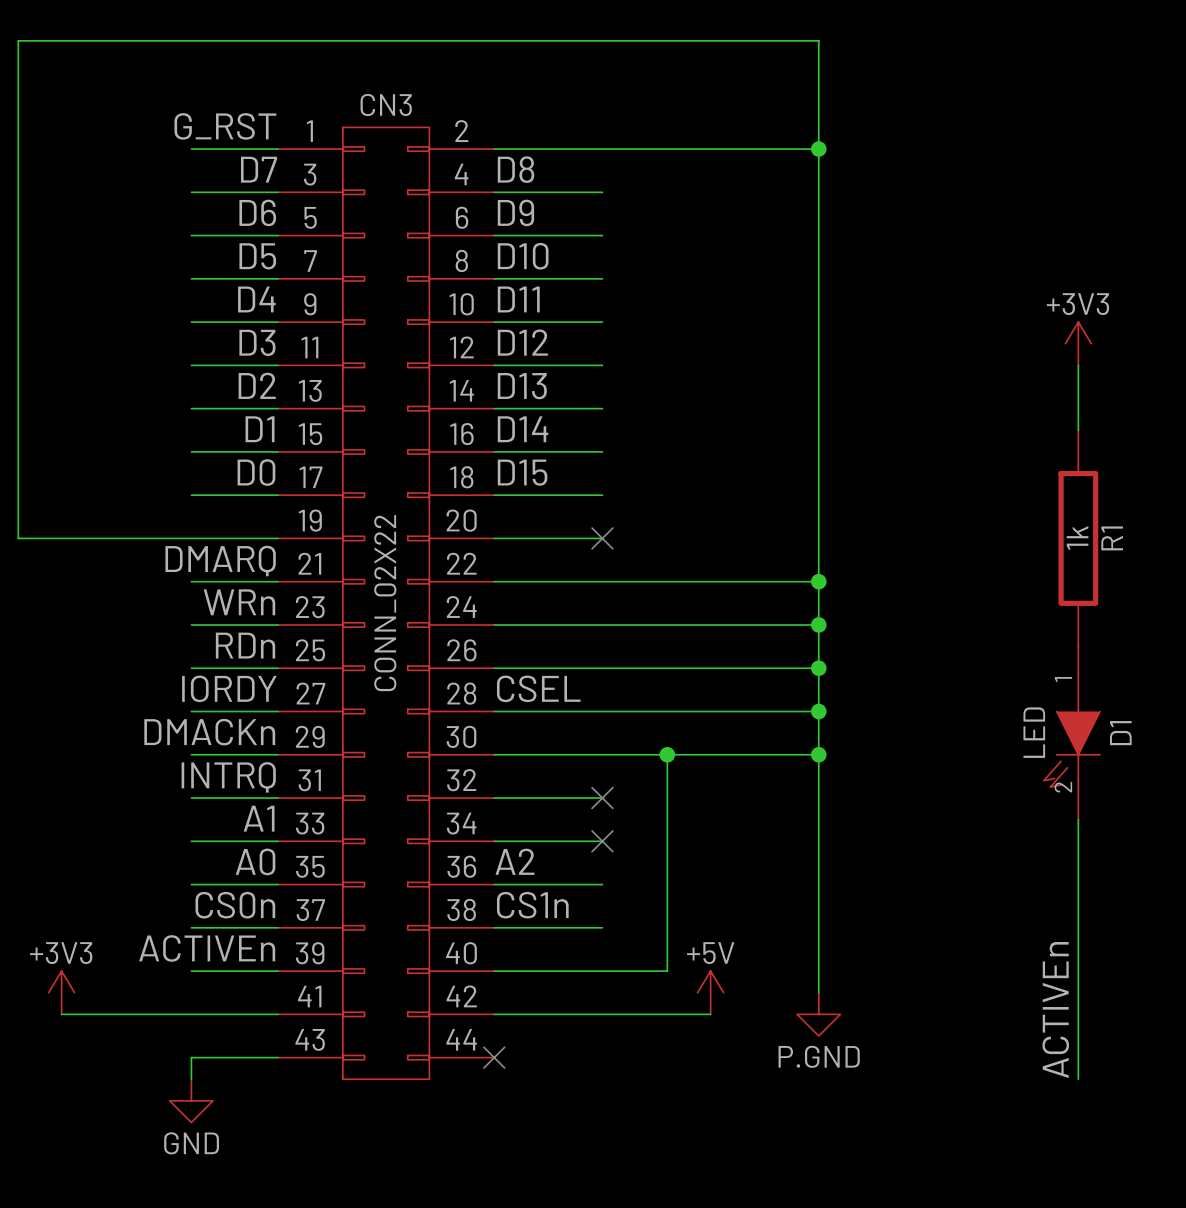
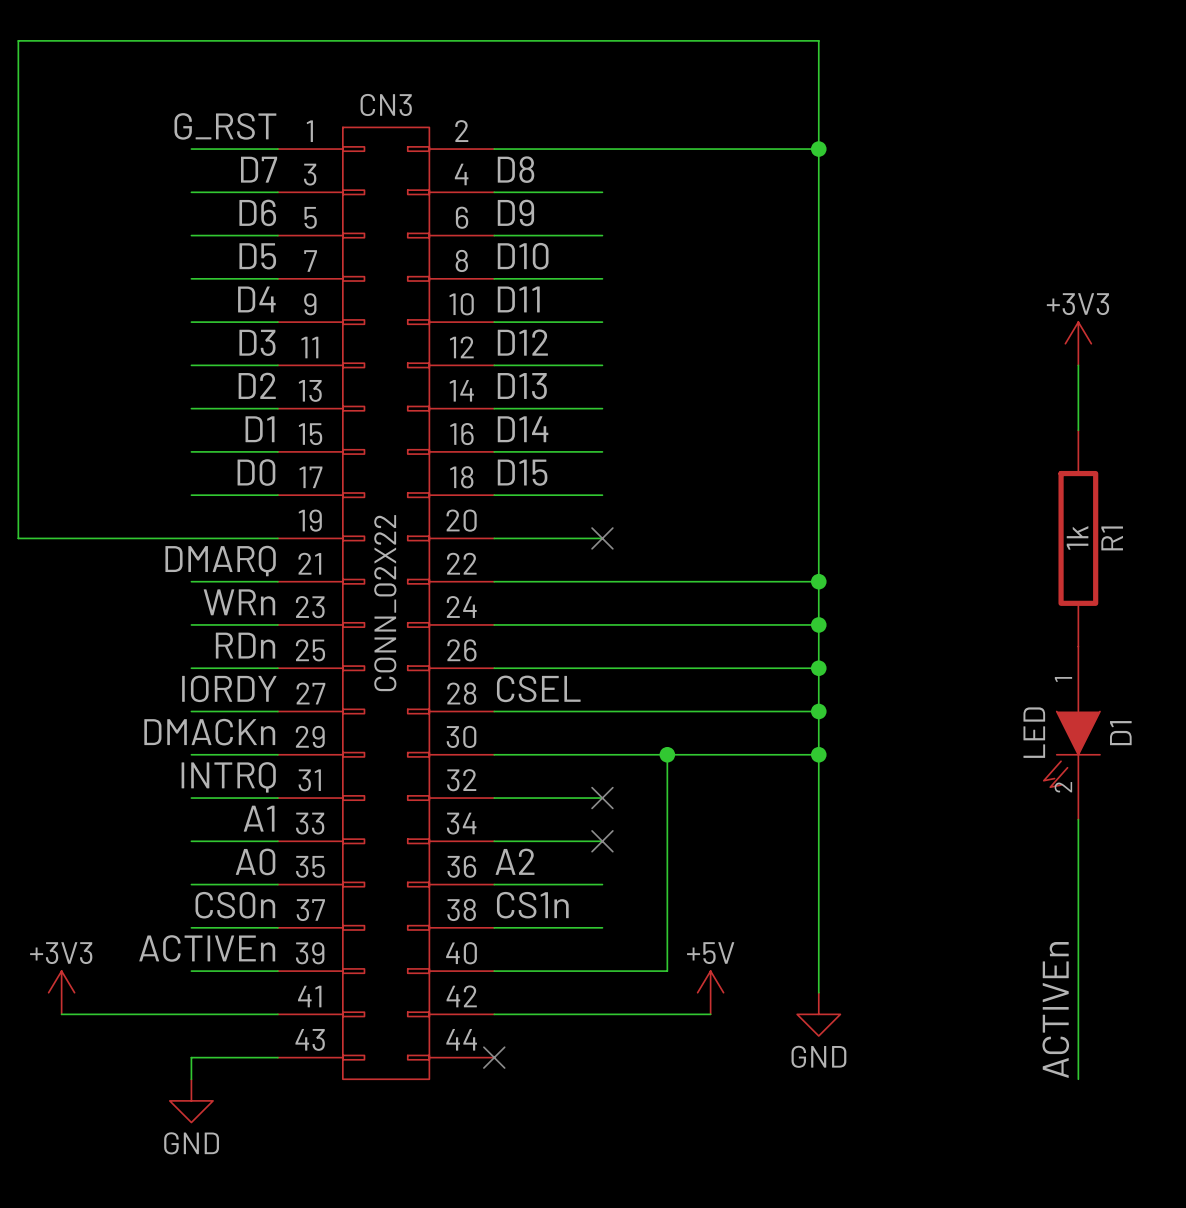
power symbol: P.GND (818, 1014) -> GND (818, 1014)

